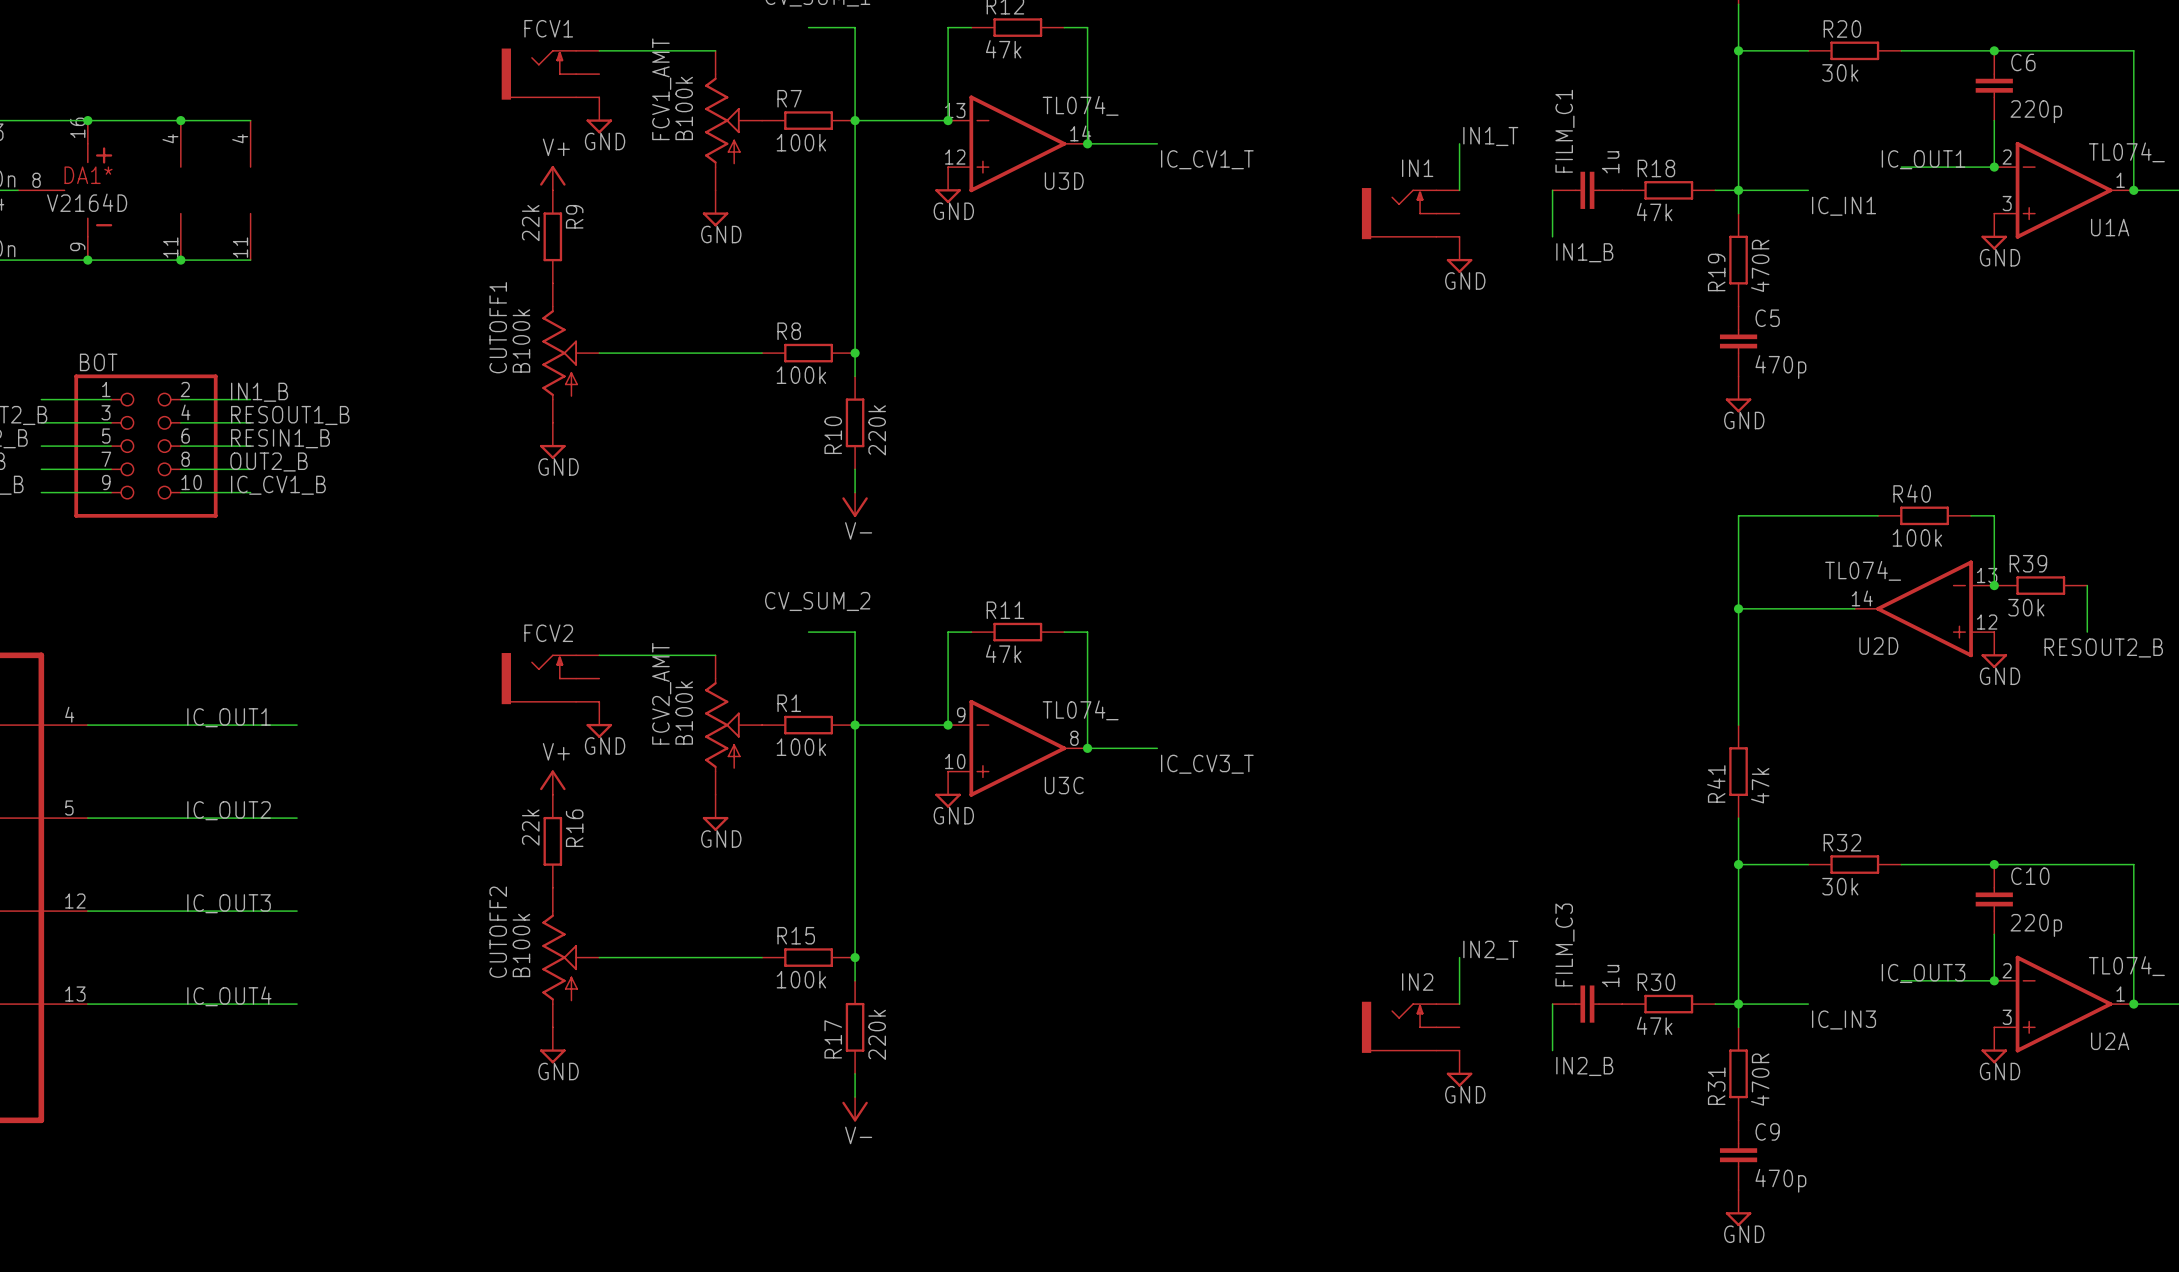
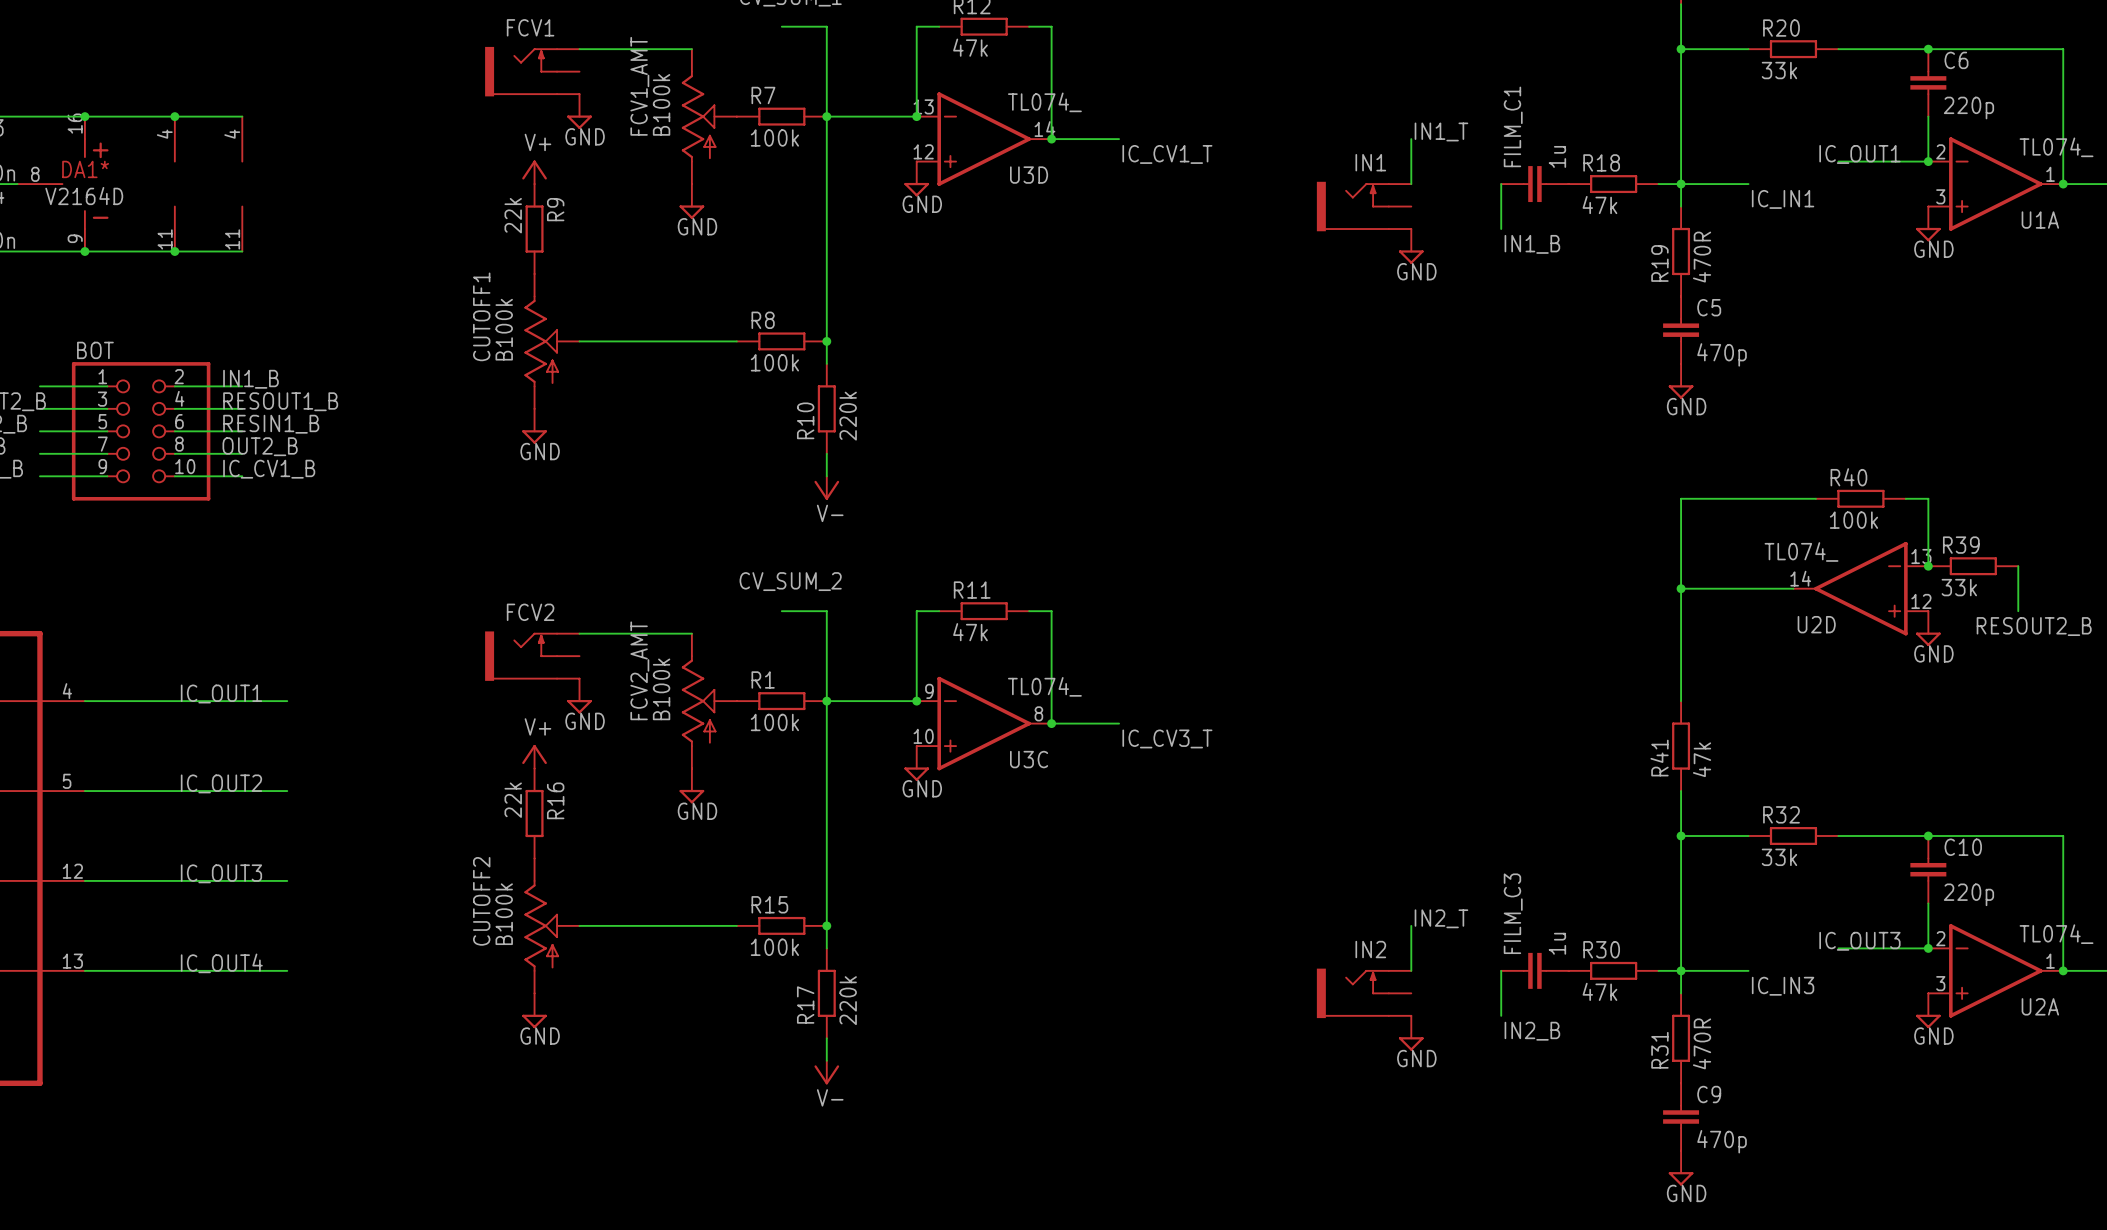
R20 value: 30k (1840, 72) -> 33k (1779, 70)
R39 value: 30k (2026, 607) -> 33k (1959, 587)
R32 value: 30k (1840, 886) -> 33k (1779, 857)

